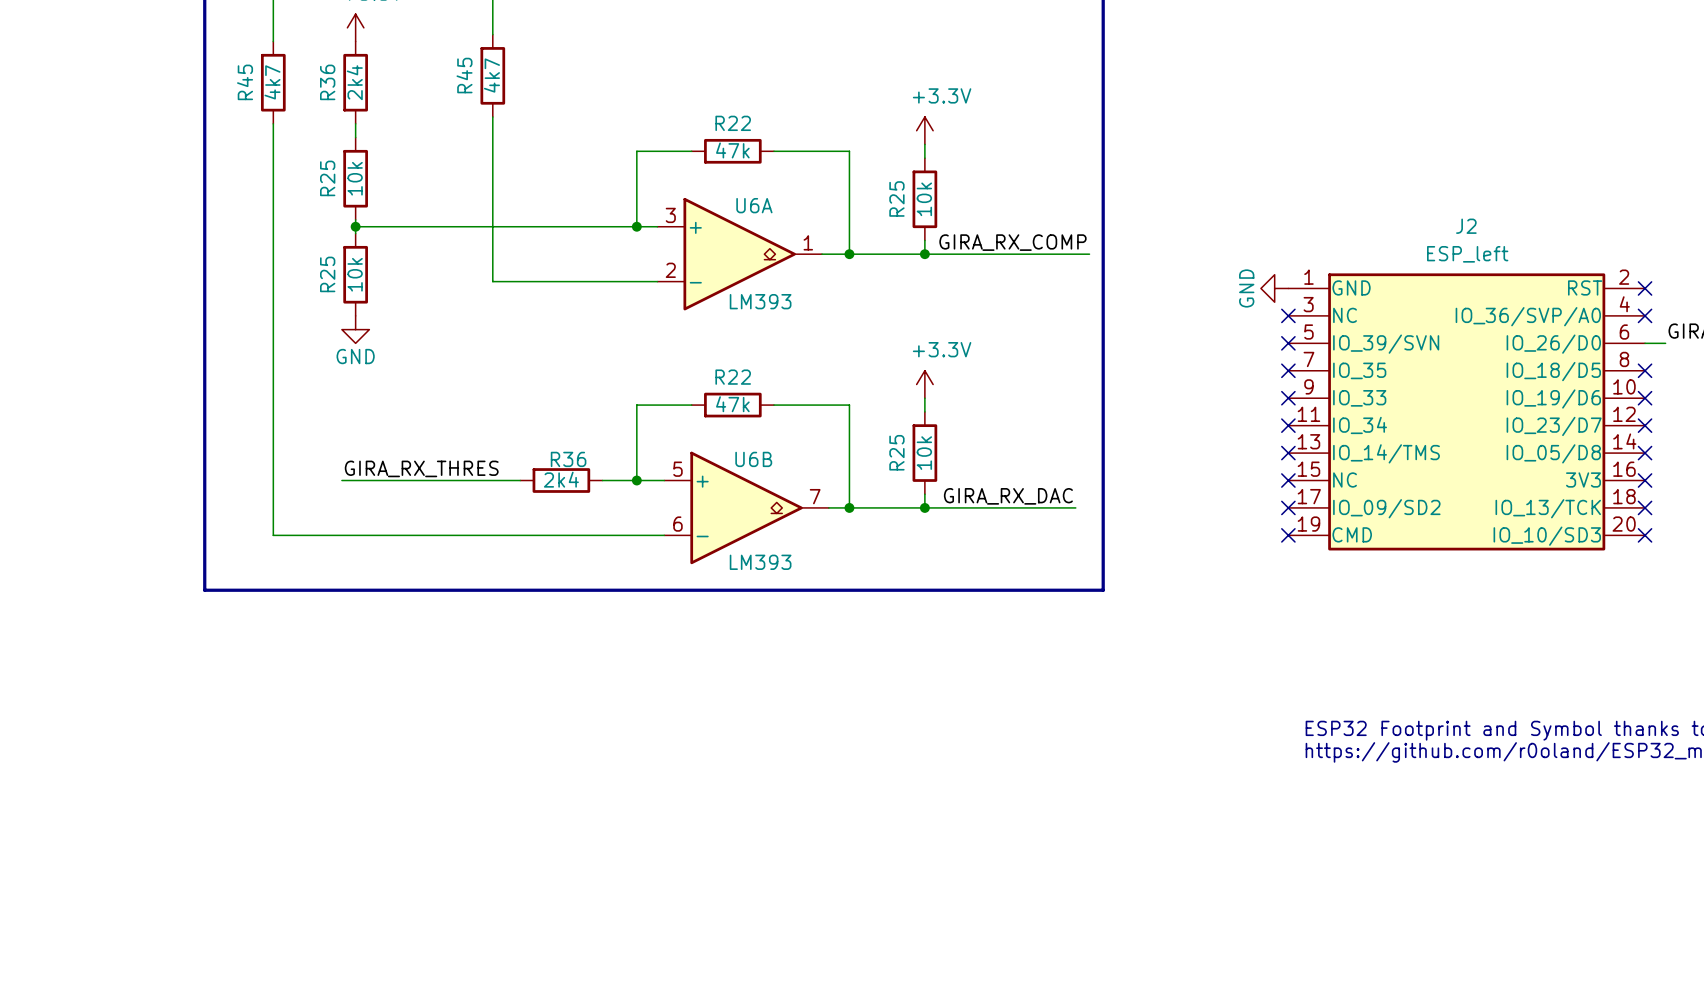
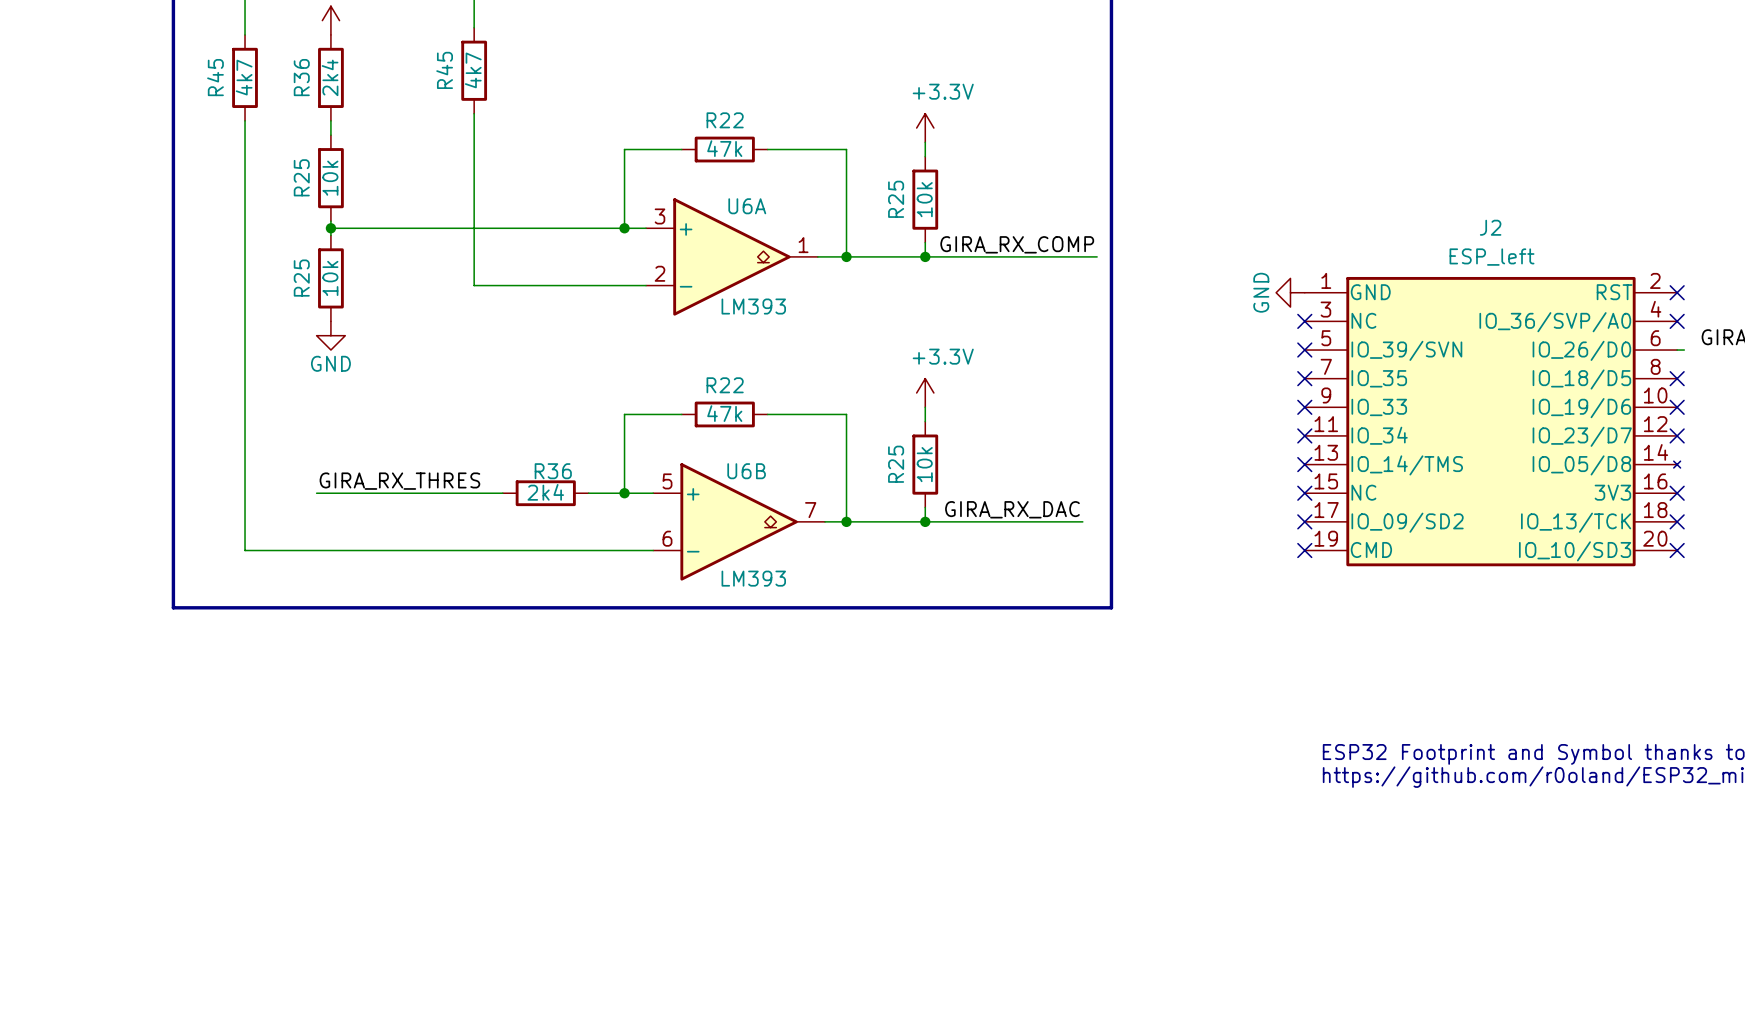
J2 symbol: [1288, 273, 1646, 551] -> [1304, 276, 1681, 567]
wire: (1651, 343) (1665, 343) -> none
no-connect mark: (1645, 453) -> none

